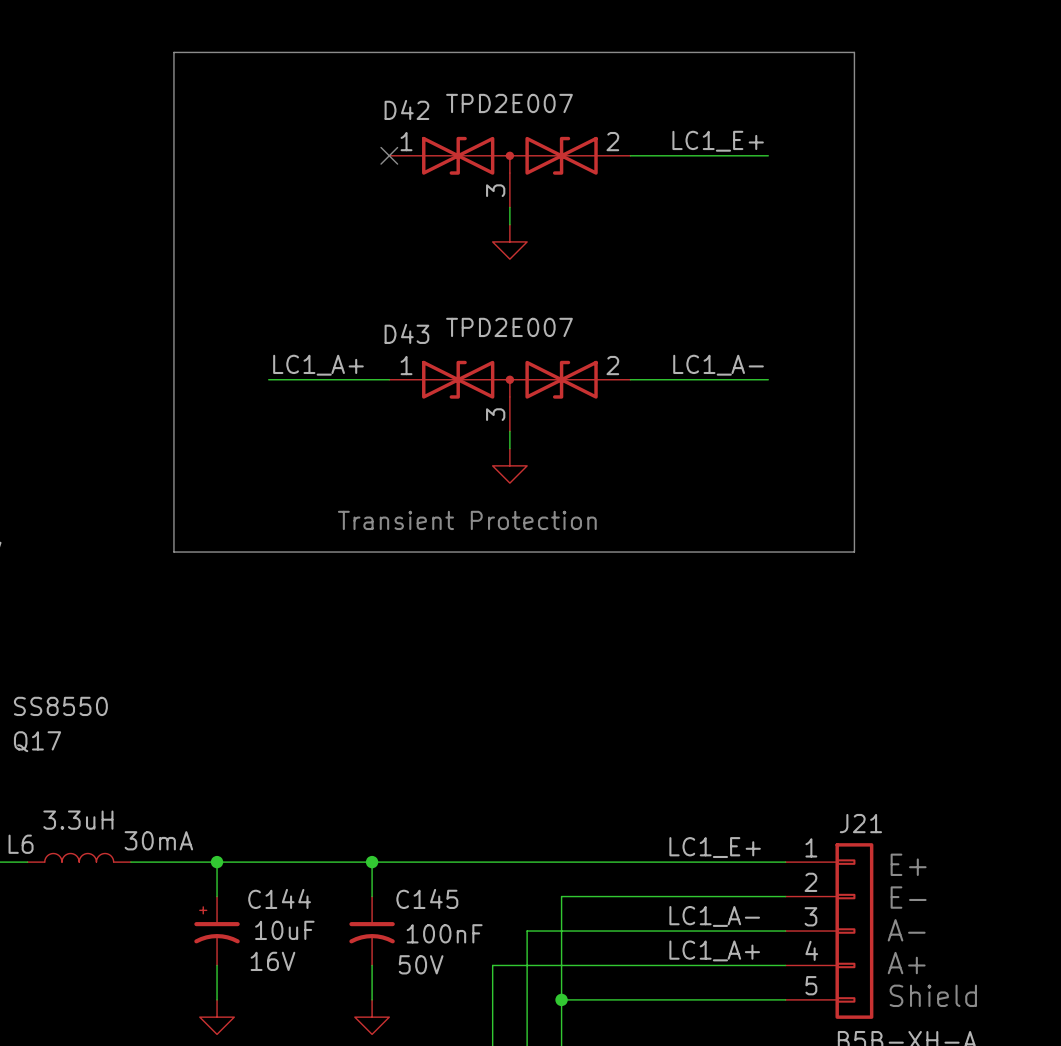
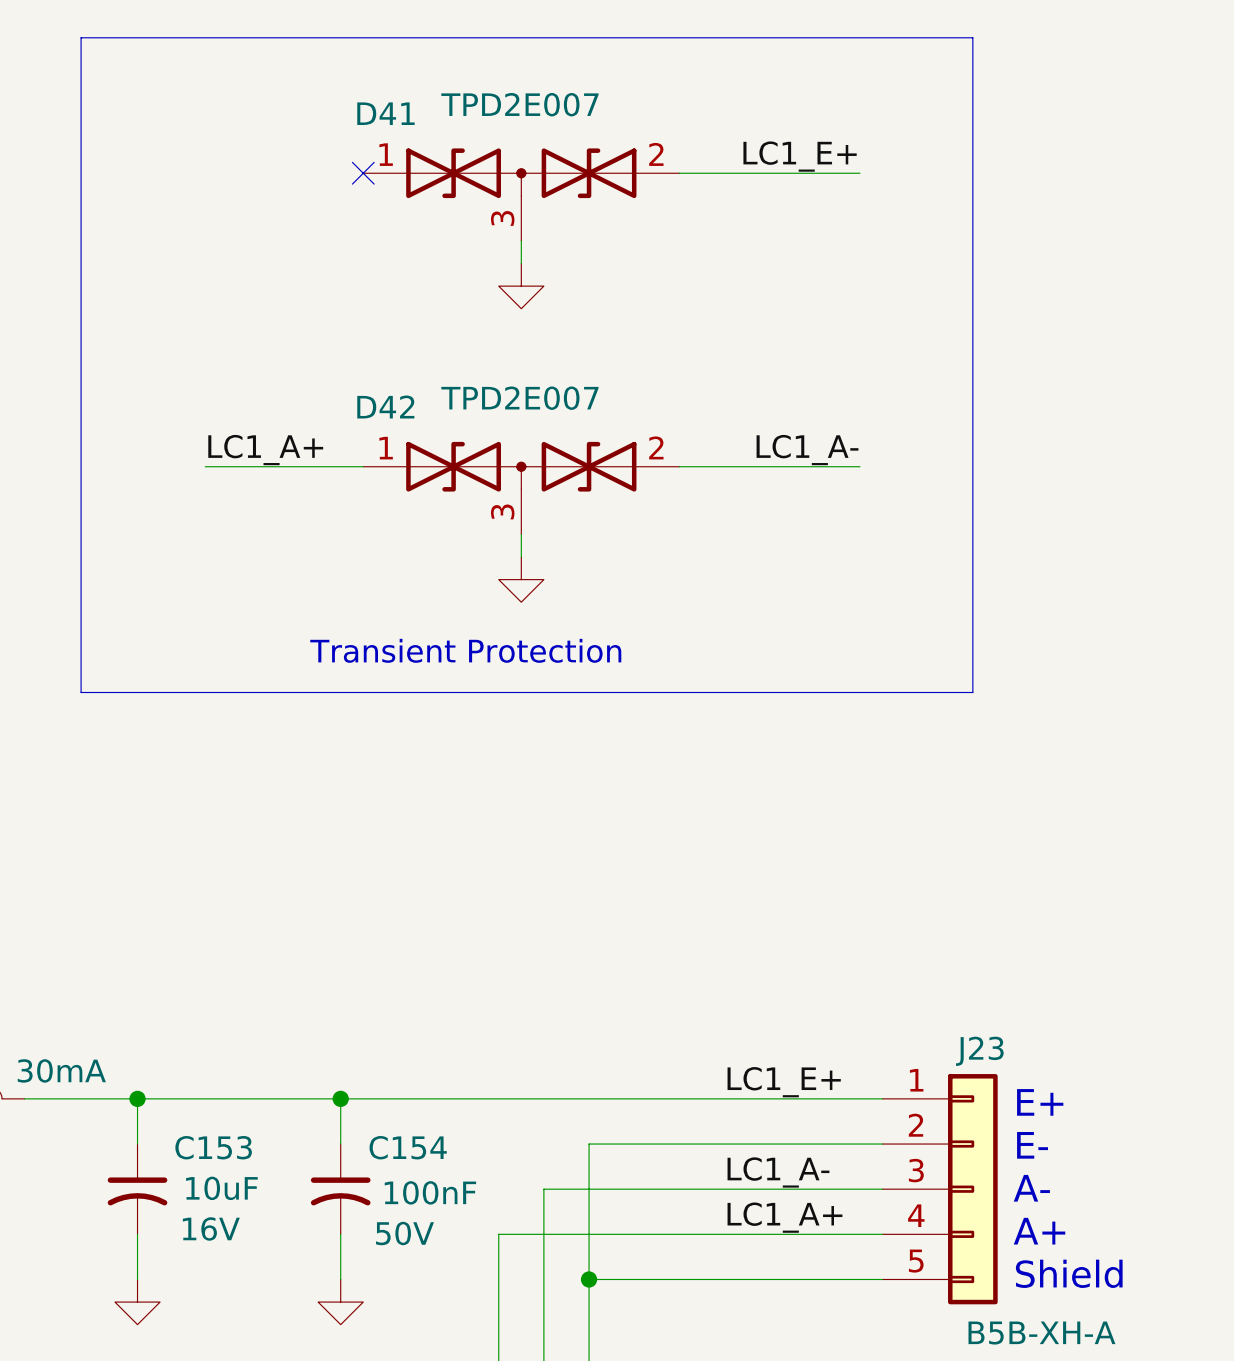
D42 name: D42 (406, 109) -> D41 (385, 113)
D43 name: D43 (406, 333) -> D42 (385, 406)
J21 name: J21 (860, 823) -> J23 (979, 1051)
C145 name: C145 (427, 898) -> C154 (408, 1147)
C144: 10uF (217, 931) -> none
C153: none -> 10uF (137, 1189)

